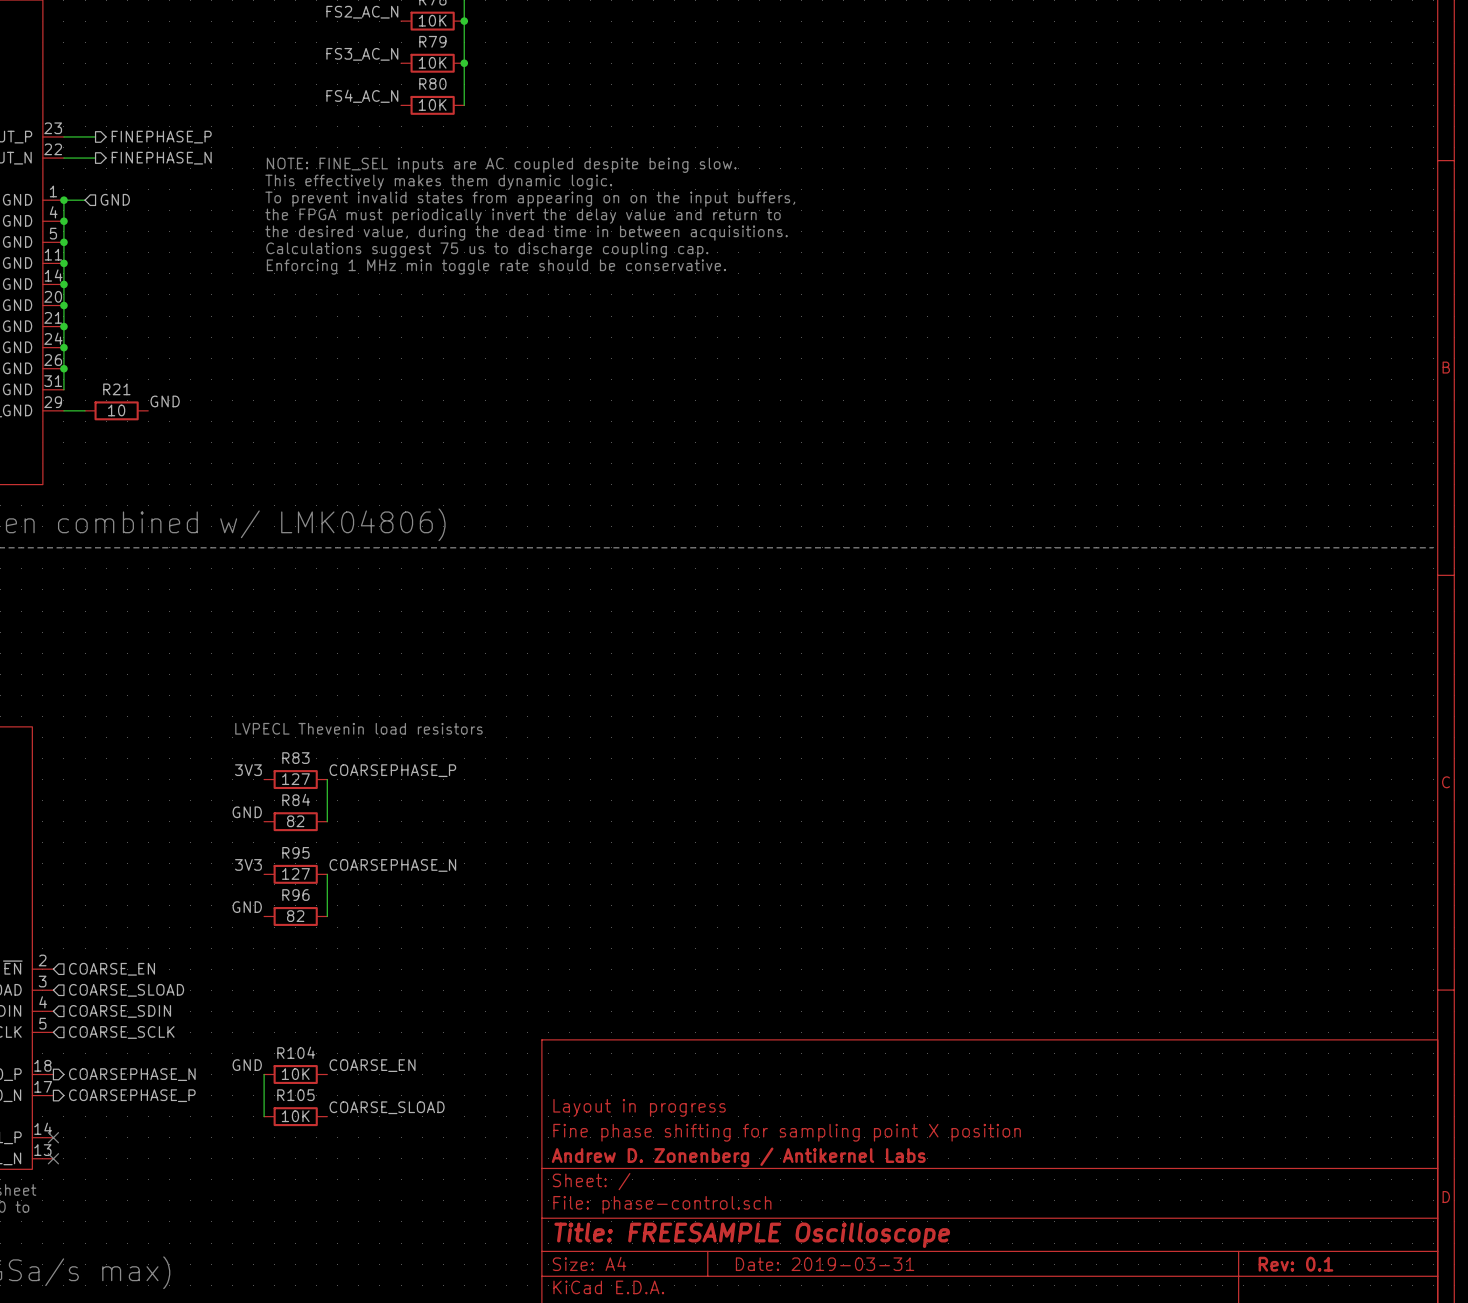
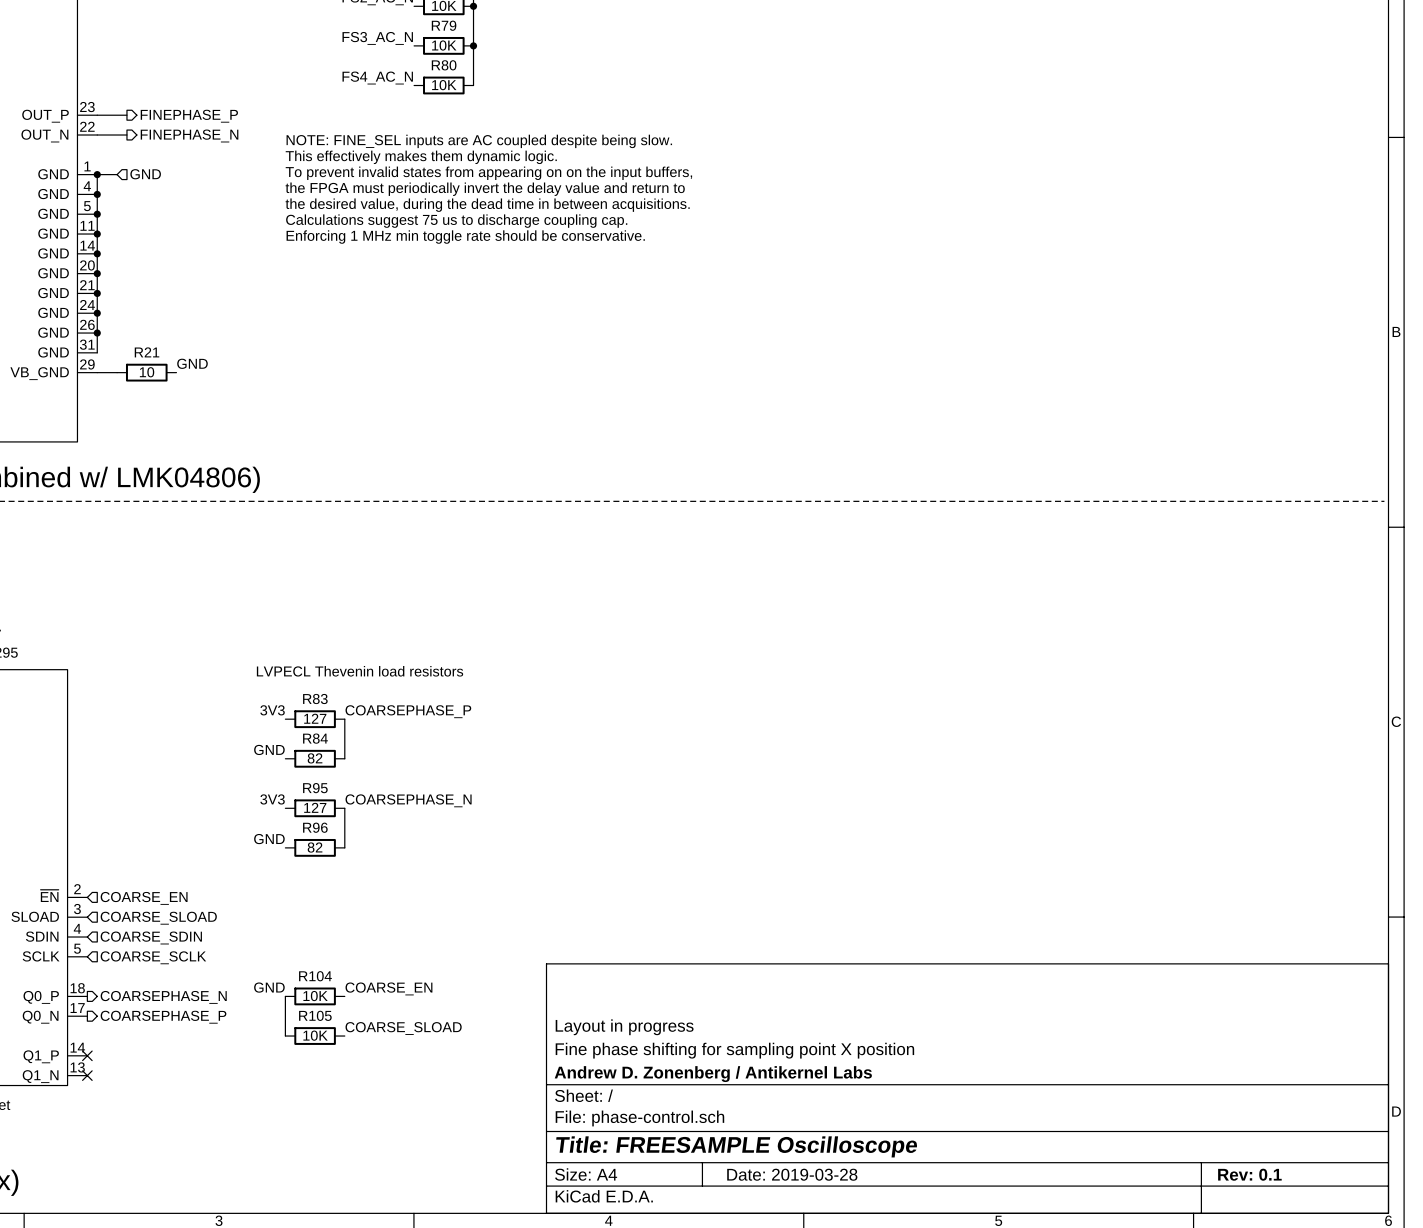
title block: Date: 2019-03-31 (825, 1264) -> Date: 2019-03-28 (792, 1174)

